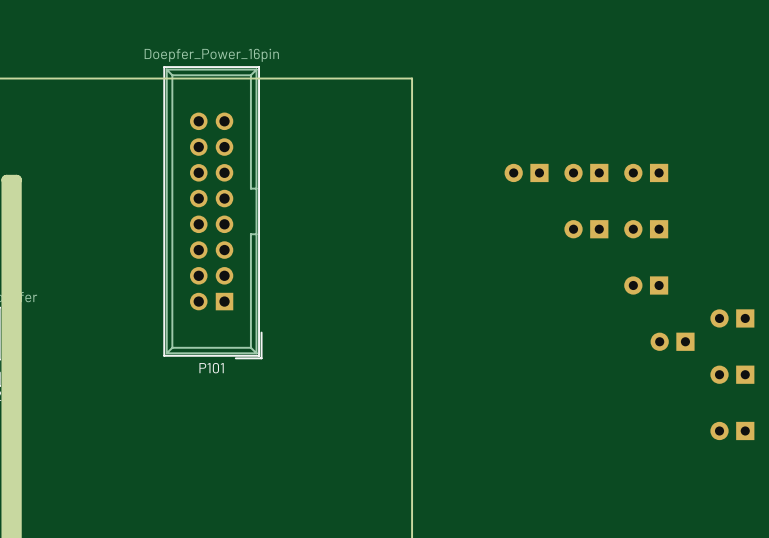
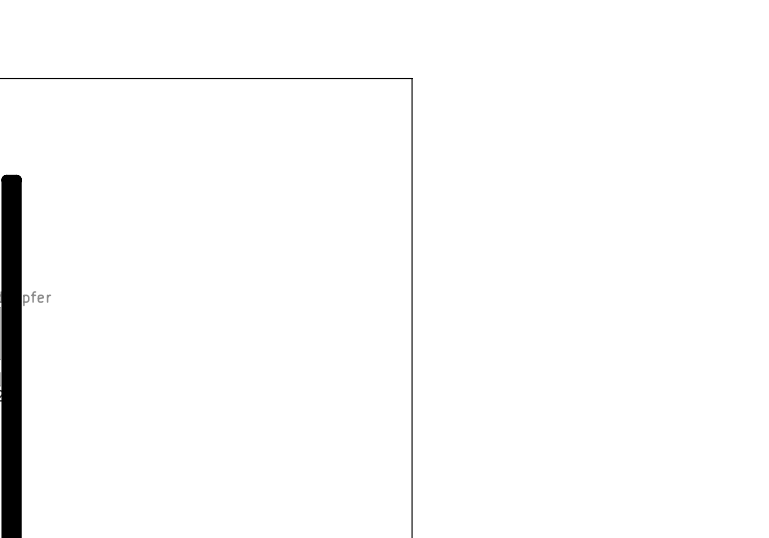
part: (526, 172) -> none
part: (586, 172) -> none
part: (646, 172) -> none
P101: Doepfer_Power_16pin (212, 212) -> none
part: (586, 229) -> none
part: (646, 229) -> none
part: (646, 285) -> none
part: (732, 318) -> none
part: (672, 341) -> none
part: (732, 374) -> none
part: (732, 430) -> none

